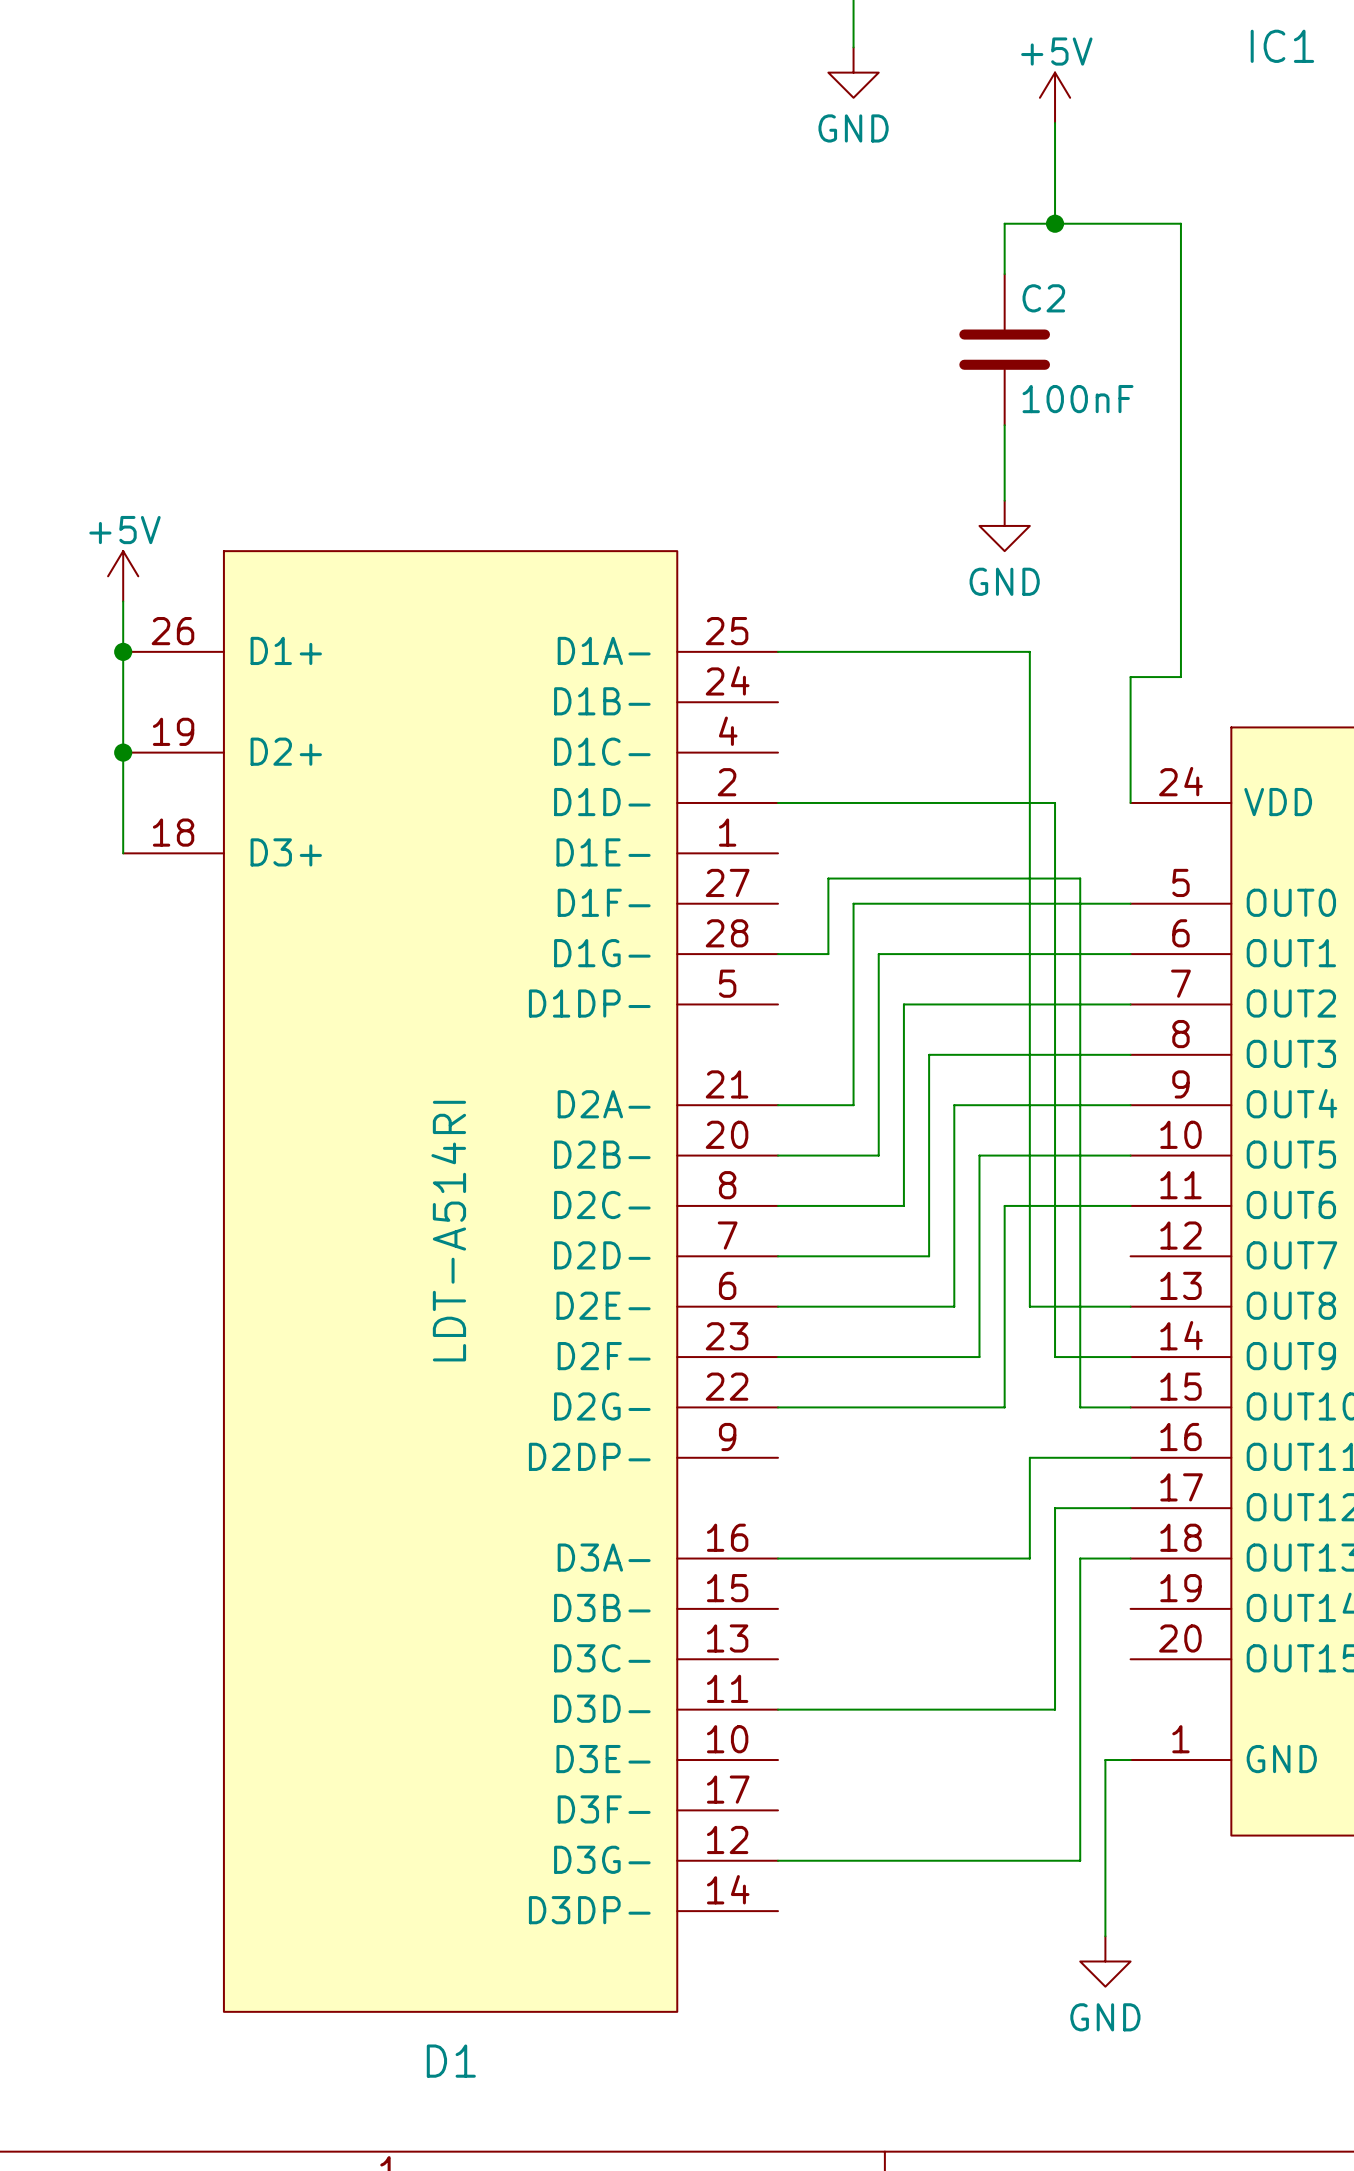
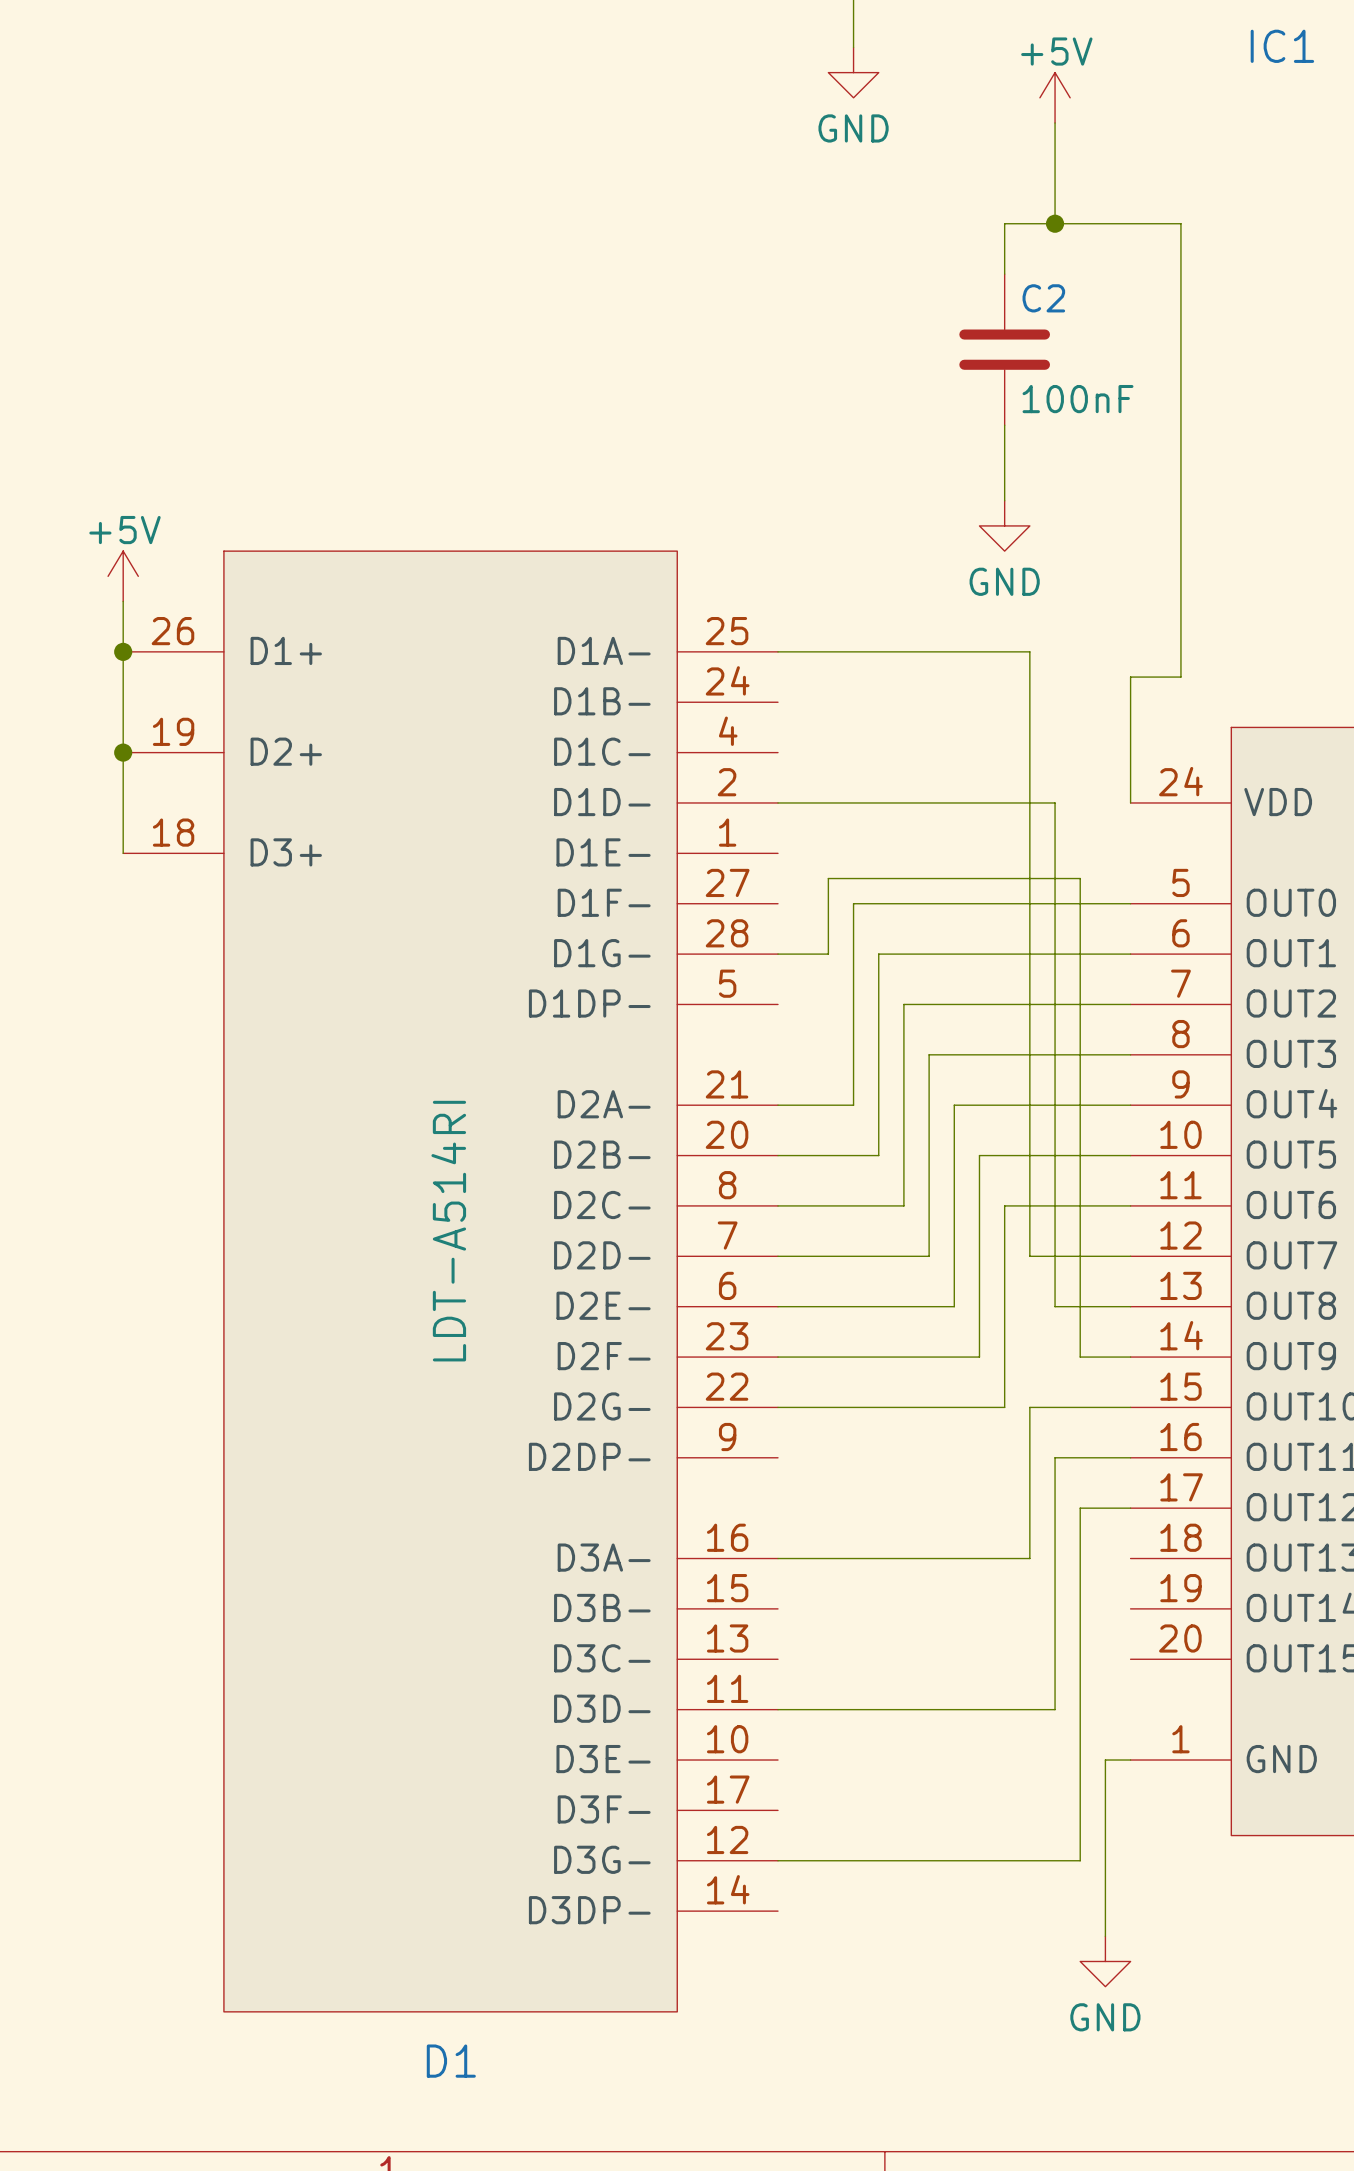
wire: (1029, 1256) (1029, 1306) (1055, 1306) (1055, 1357) (1080, 1357) (1080, 1407) -> (1029, 1256) (1130, 1256)
wire: (1029, 1457) (1055, 1457) -> (1029, 1457) (1029, 1407) (1080, 1407)
wire: (1055, 1508) (1080, 1508) -> (1055, 1508) (1055, 1457)
wire: (1080, 1558) (1130, 1558) -> (1080, 1558) (1080, 1508)

